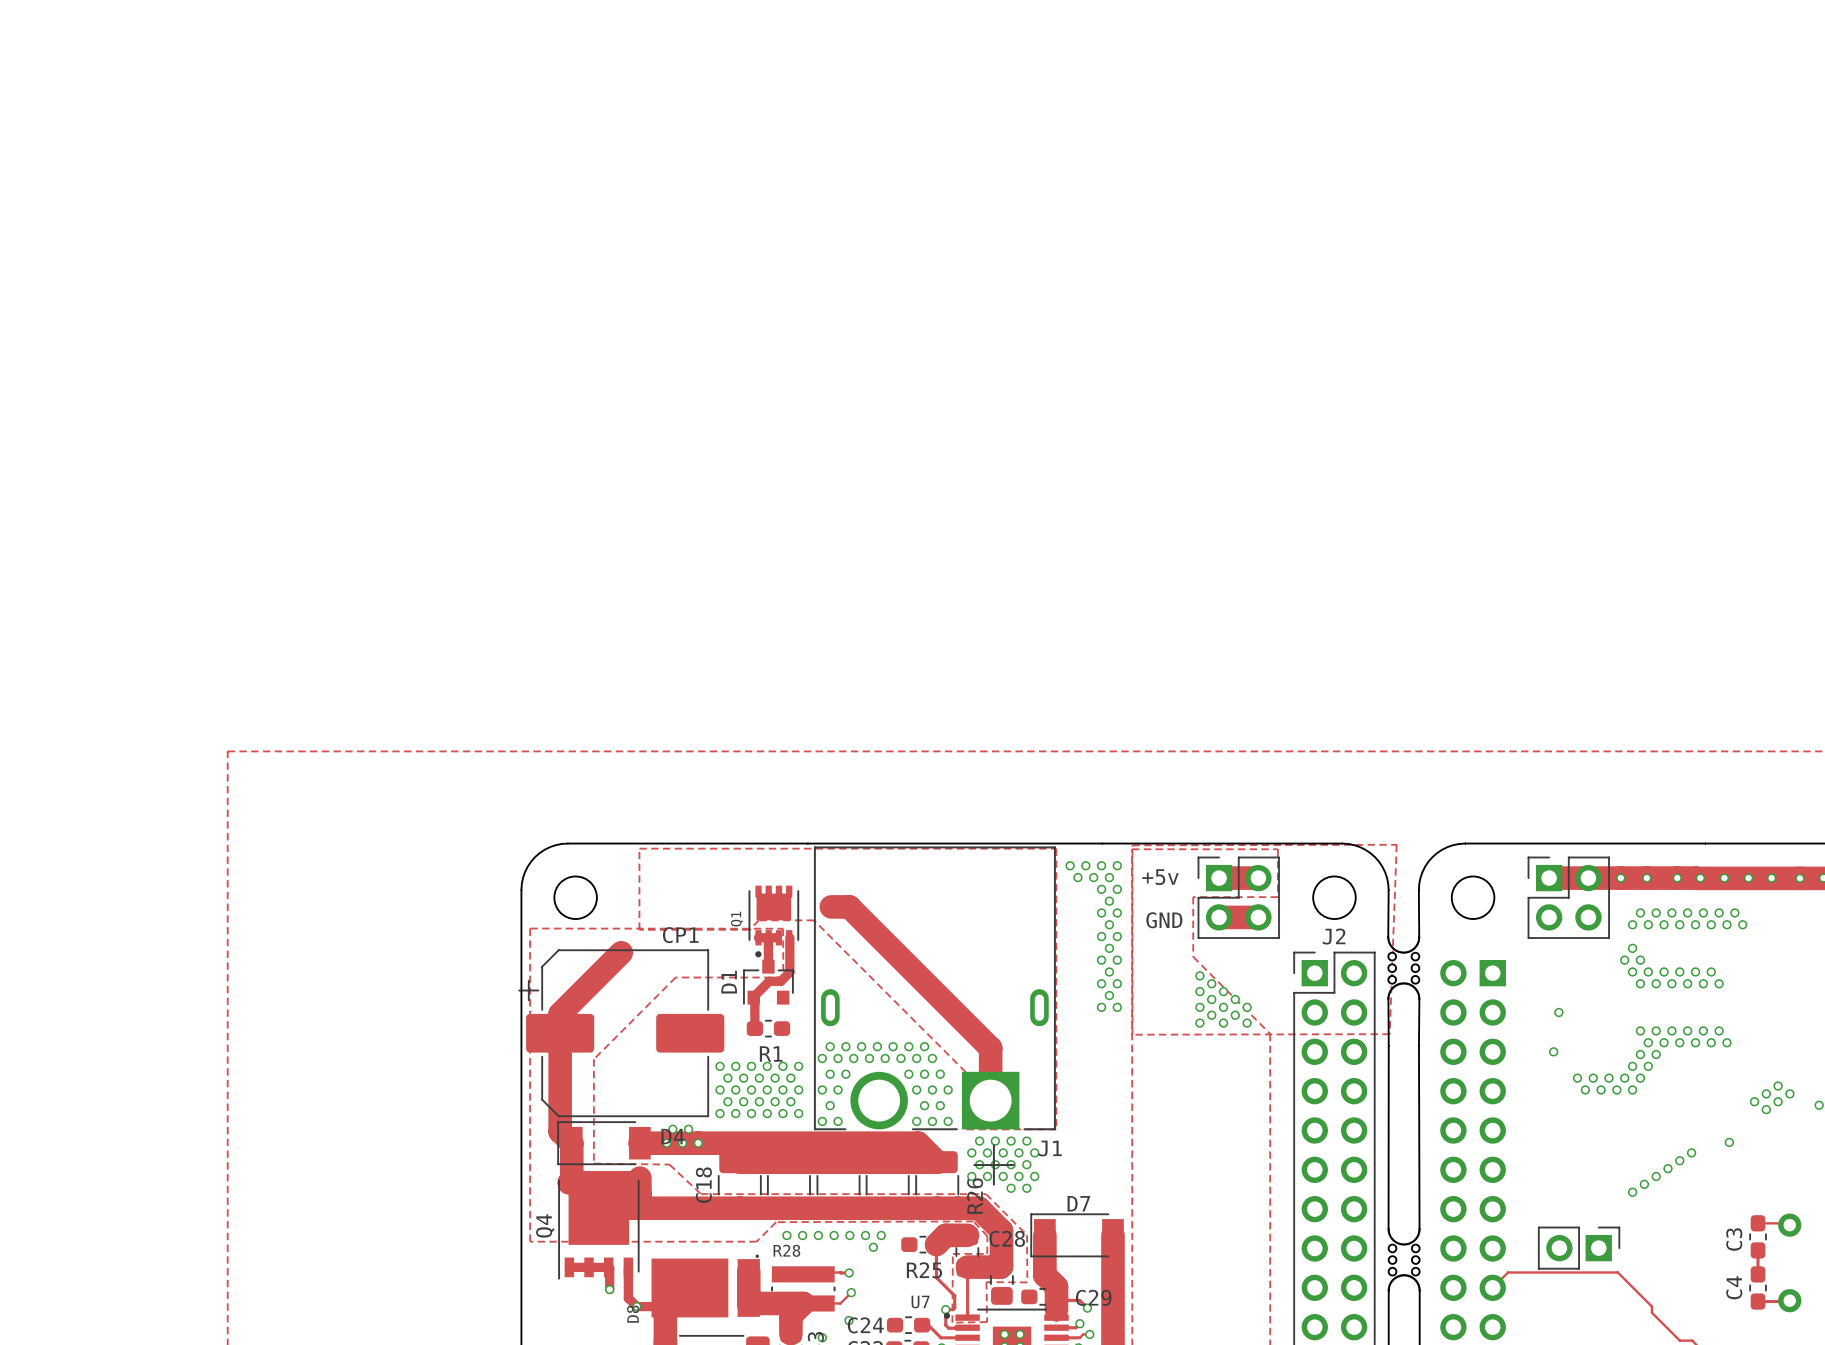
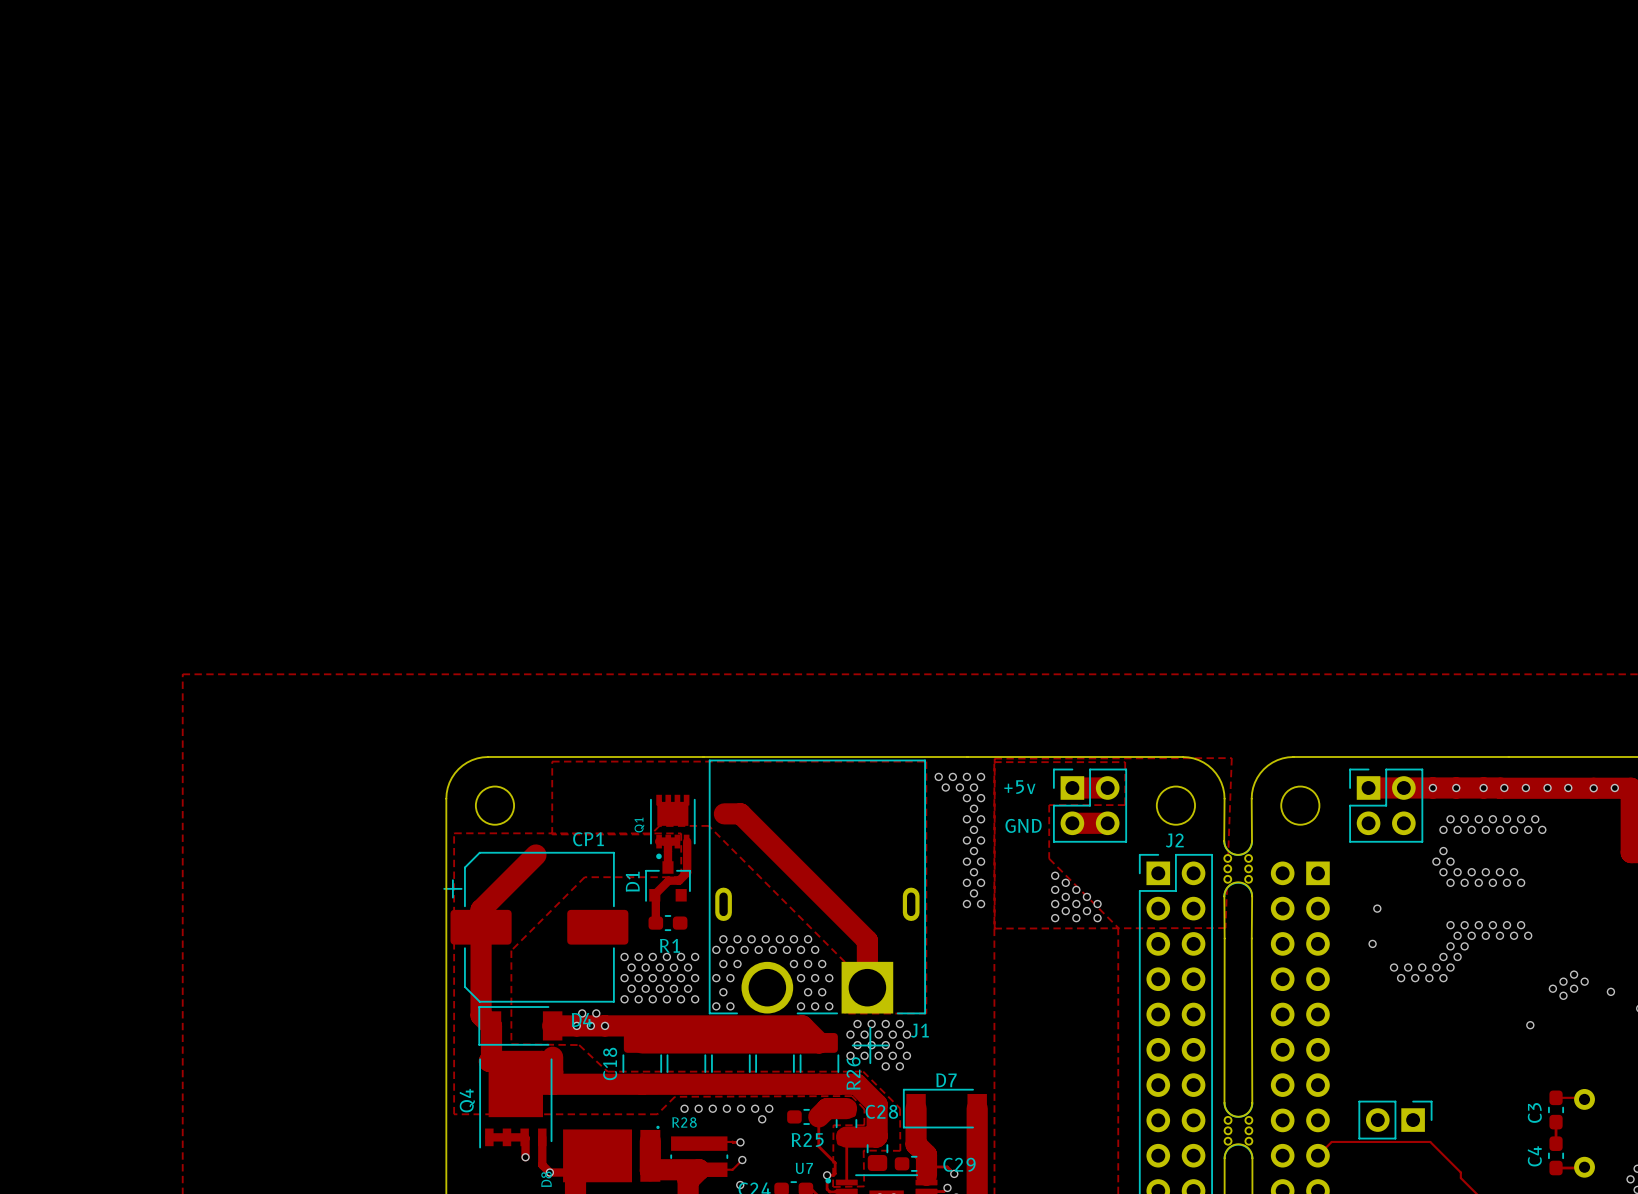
via: (1691, 1152) -> none
via: (1679, 1160) -> none
via: (1667, 1168) -> none
via: (1656, 1176) -> none
via: (1644, 1184) -> none
via: (1632, 1192) -> none

